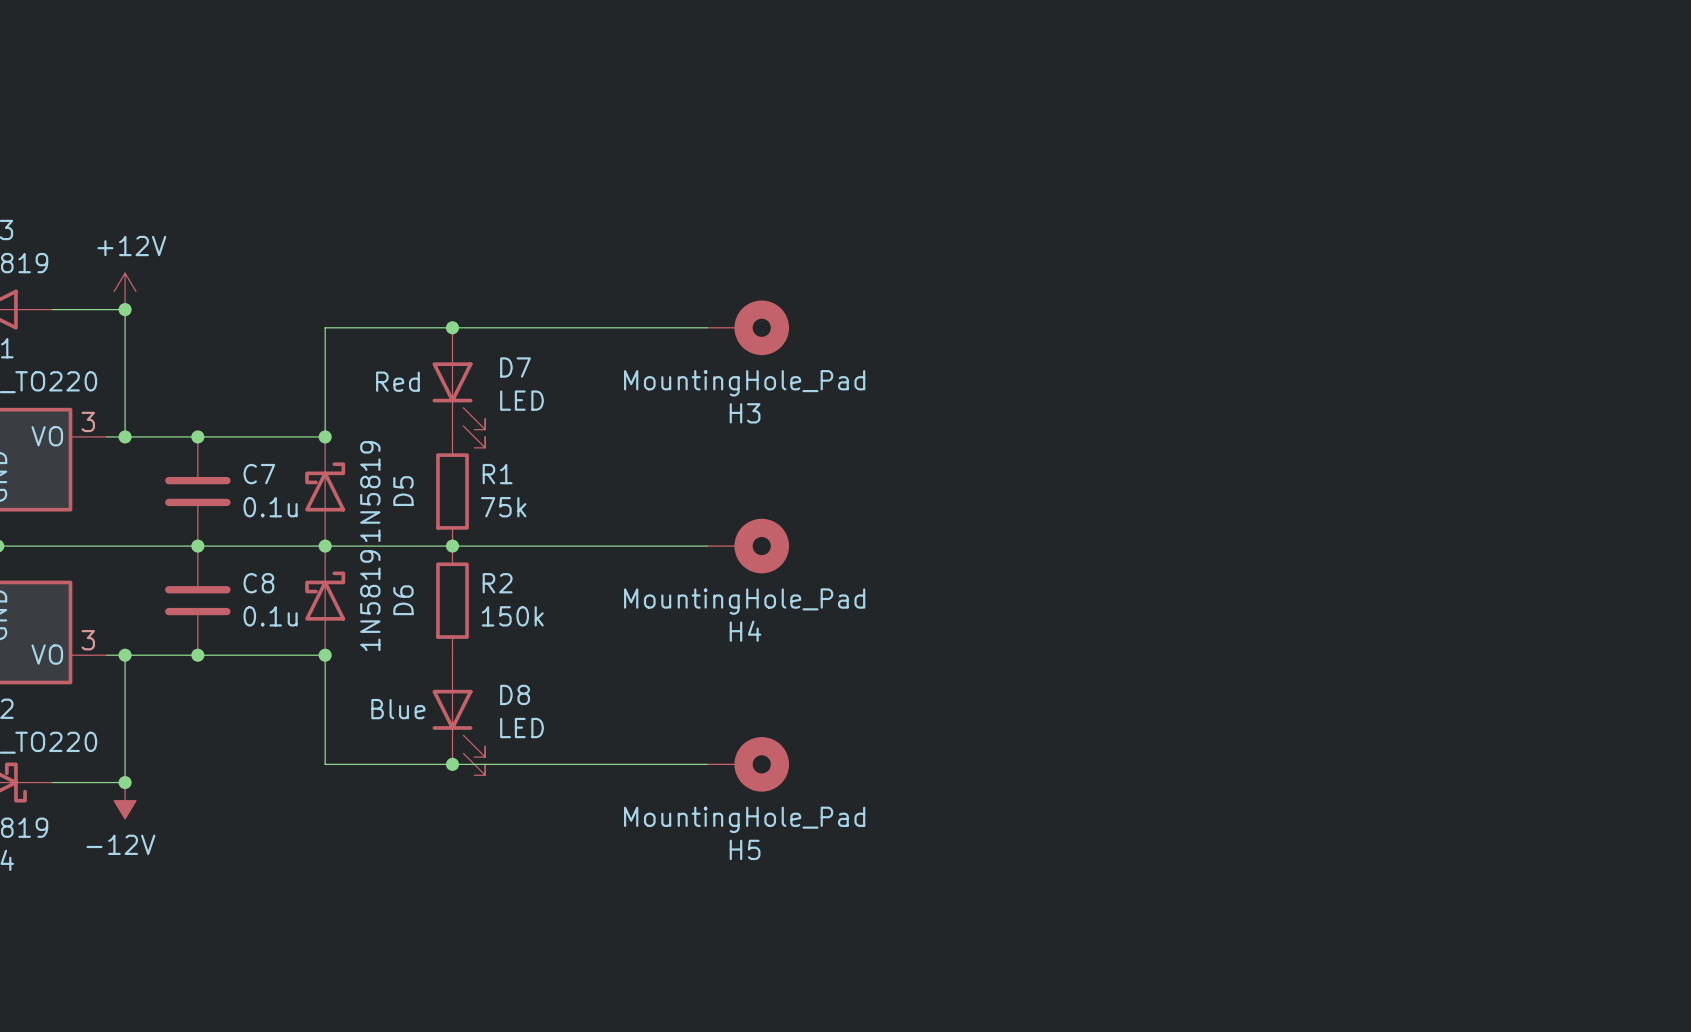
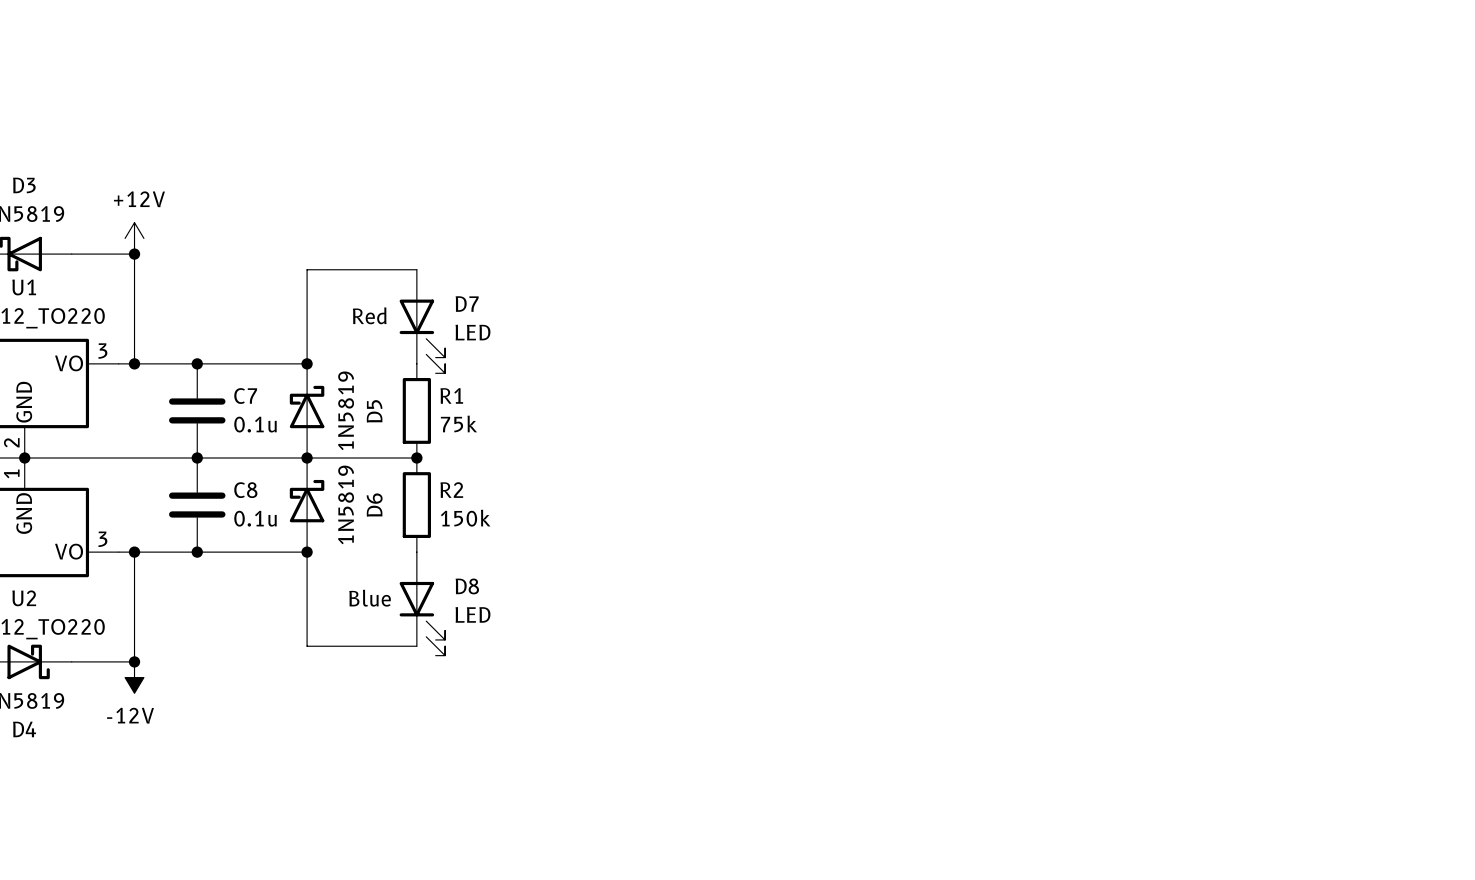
wire: (452, 327) (707, 327) -> none
junction: (452, 327) -> none
H3: MountingHole_Pad (748, 327) -> none
wire: (452, 546) (707, 546) -> none
H4: MountingHole_Pad (748, 546) -> none
wire: (452, 764) (707, 764) -> none
junction: (452, 764) -> none
H5: MountingHole_Pad (748, 764) -> none

